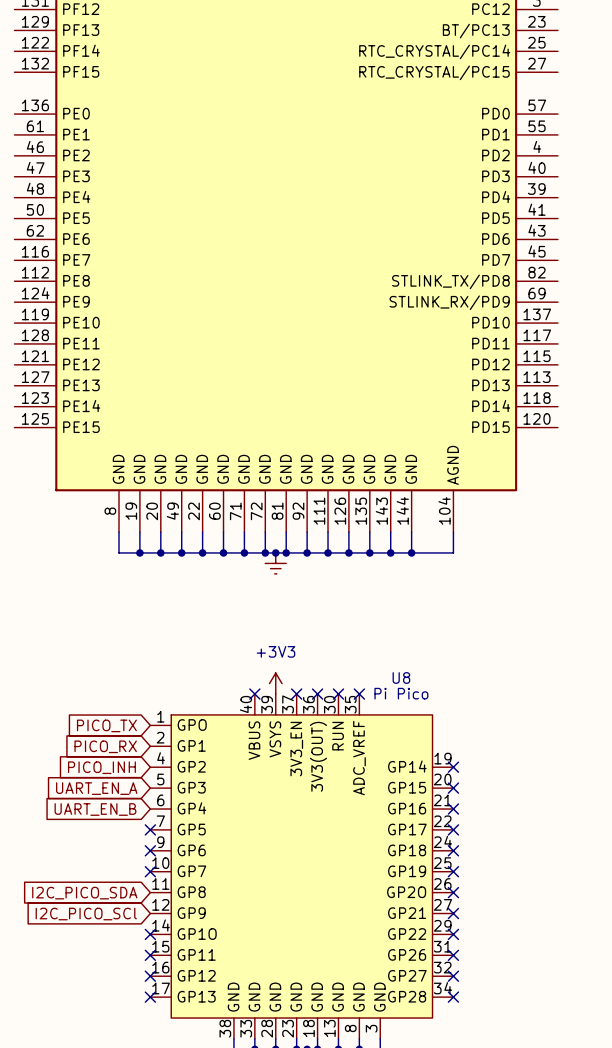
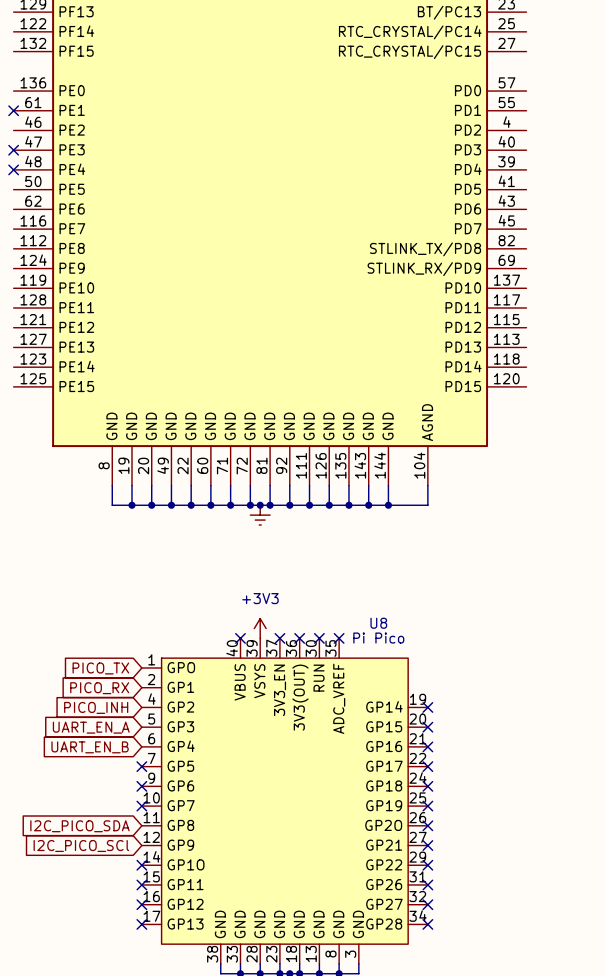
no-connect mark: none -> (13, 110)
no-connect mark: none -> (13, 150)
no-connect mark: none -> (13, 169)

